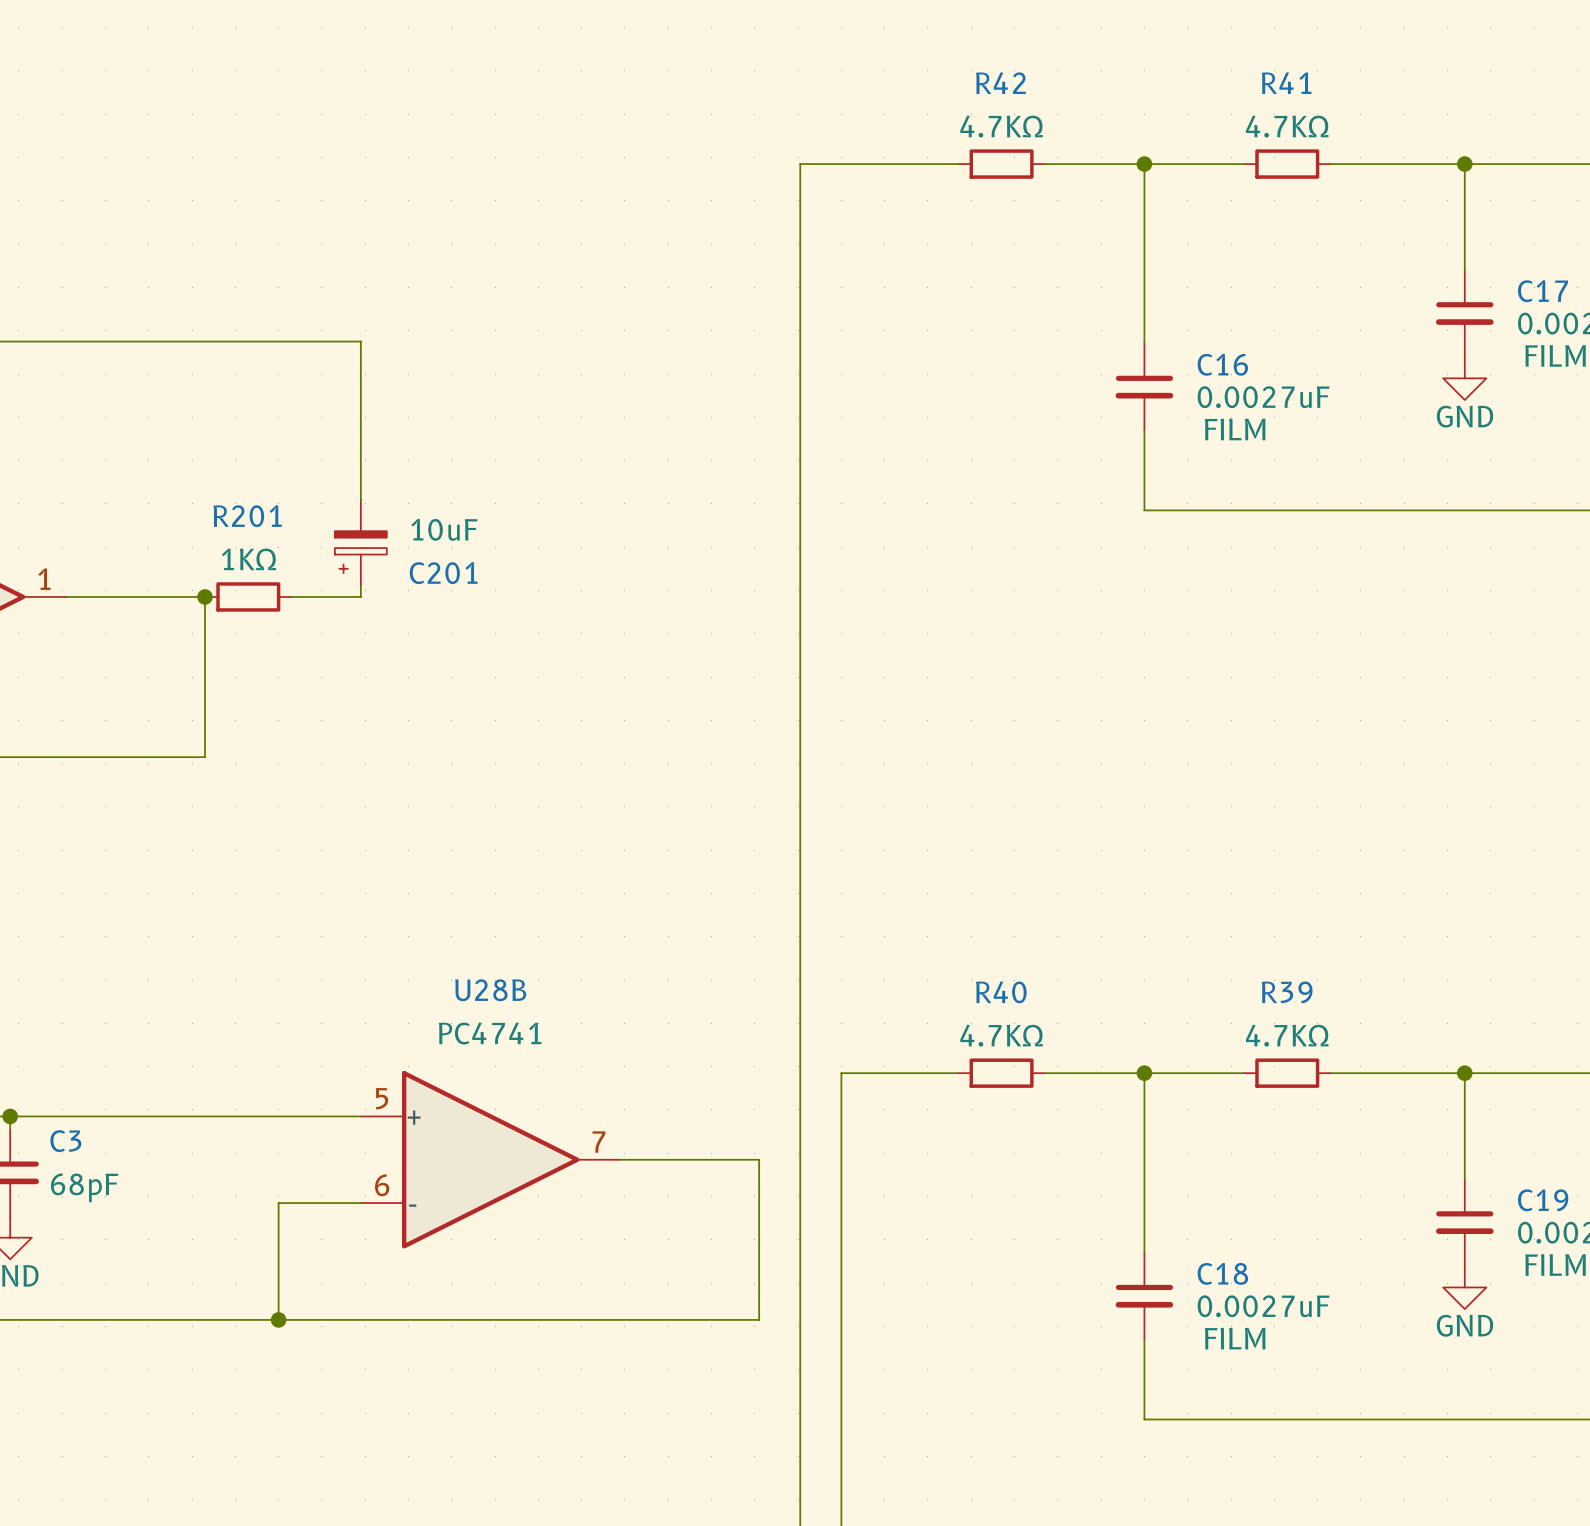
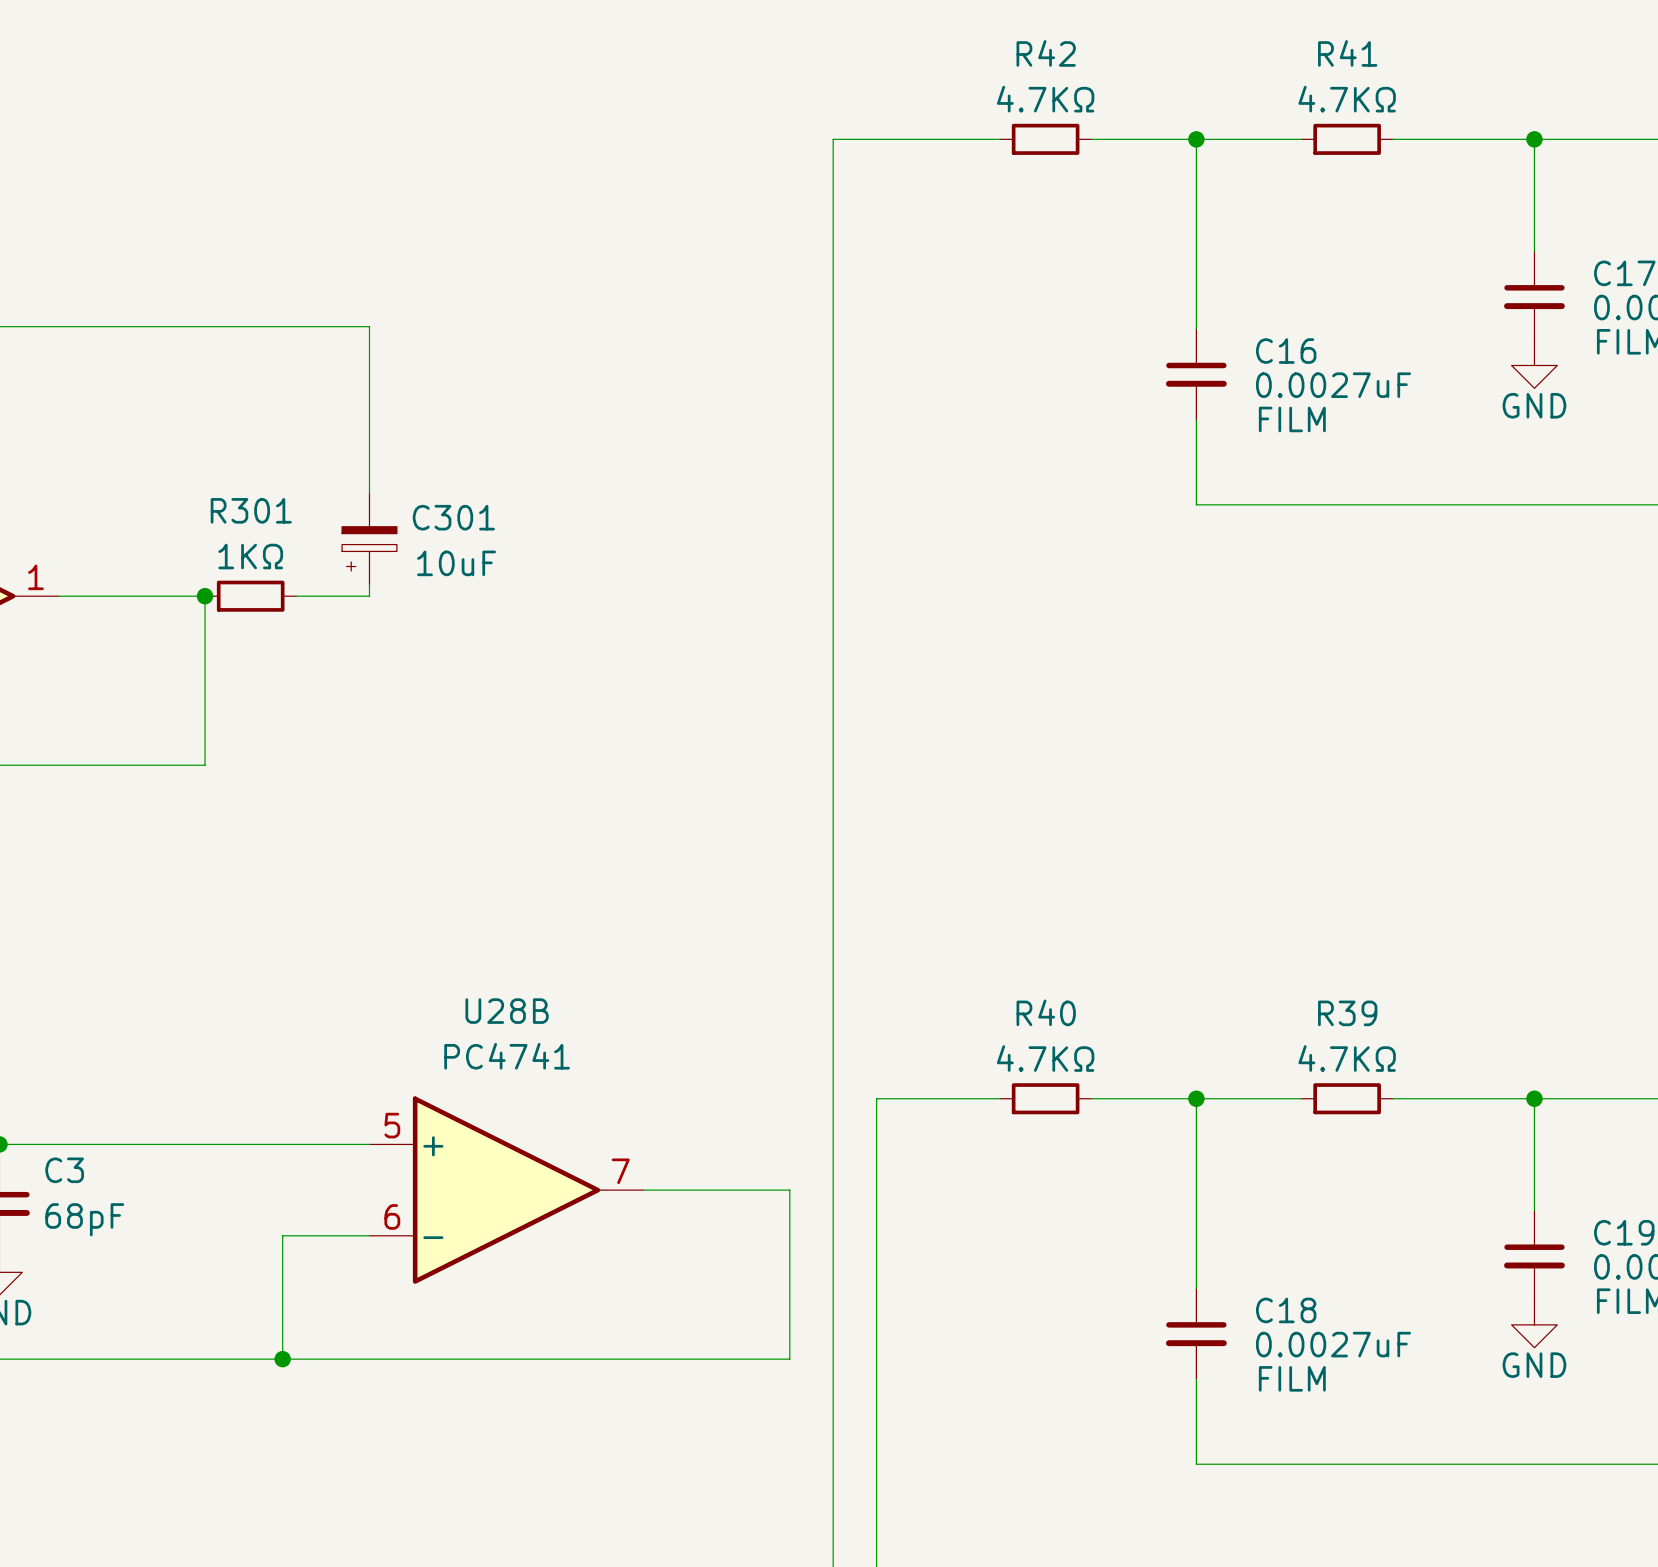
R201 name: R201 (247, 516) -> R301 (251, 510)
C201 value position: 10uF (444, 529) -> 10uF (456, 563)
C201 name: C201 (443, 573) -> C301 (453, 517)

